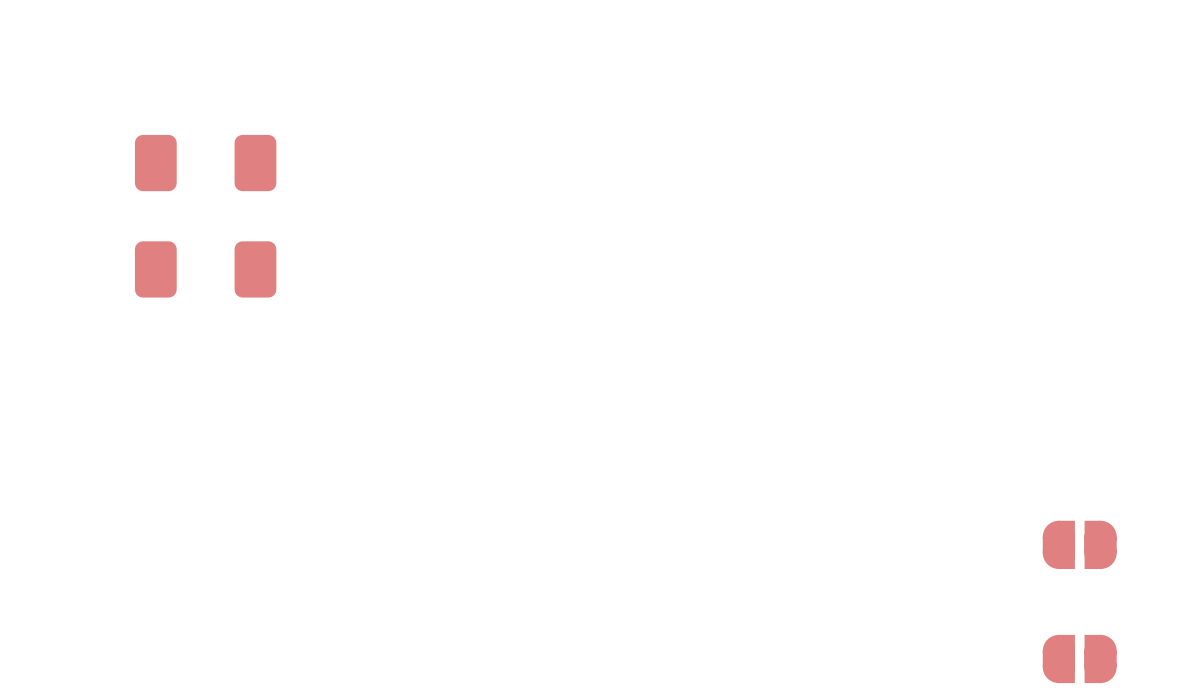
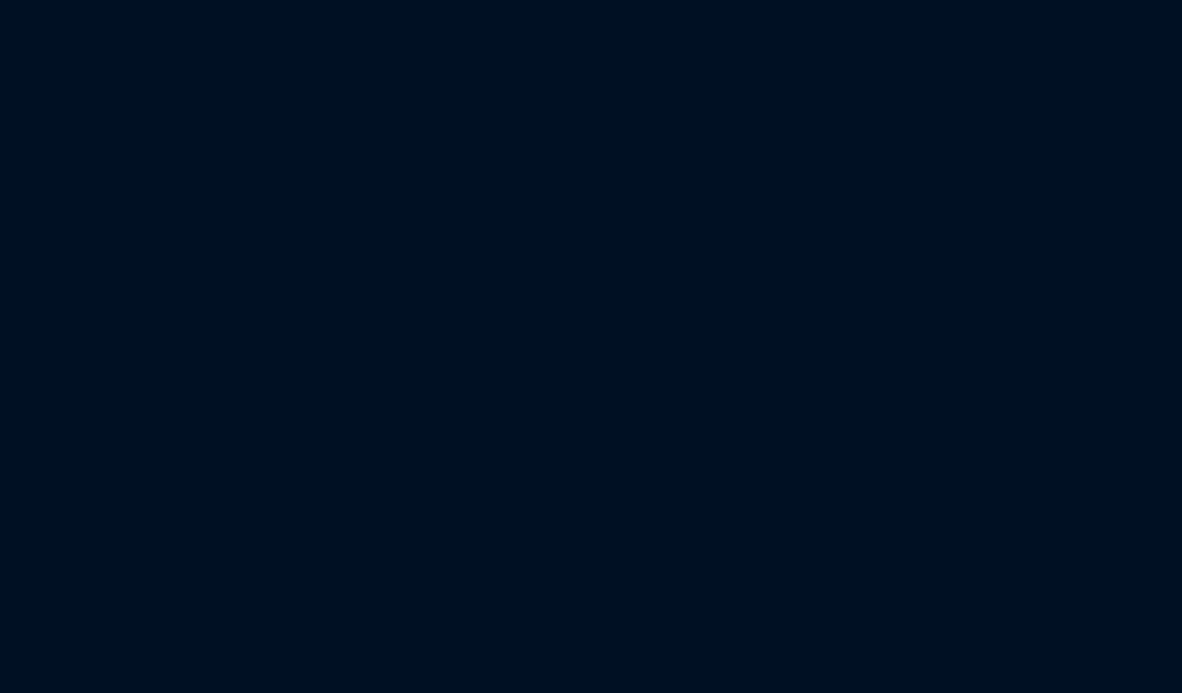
part: (205, 163) -> none
part: (205, 269) -> none
part: (1079, 544) -> none
part: (1079, 658) -> none

